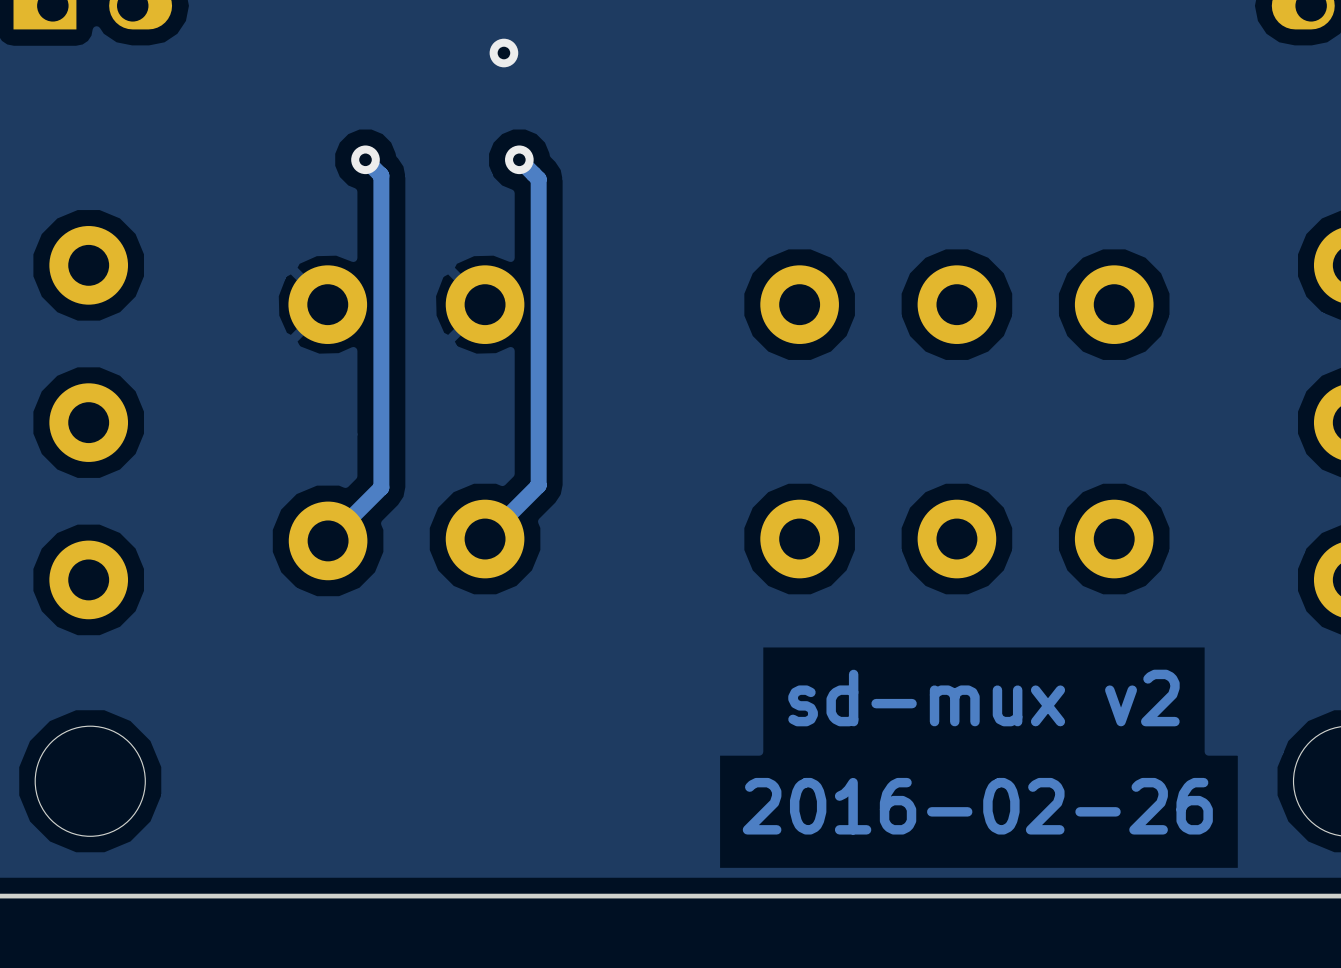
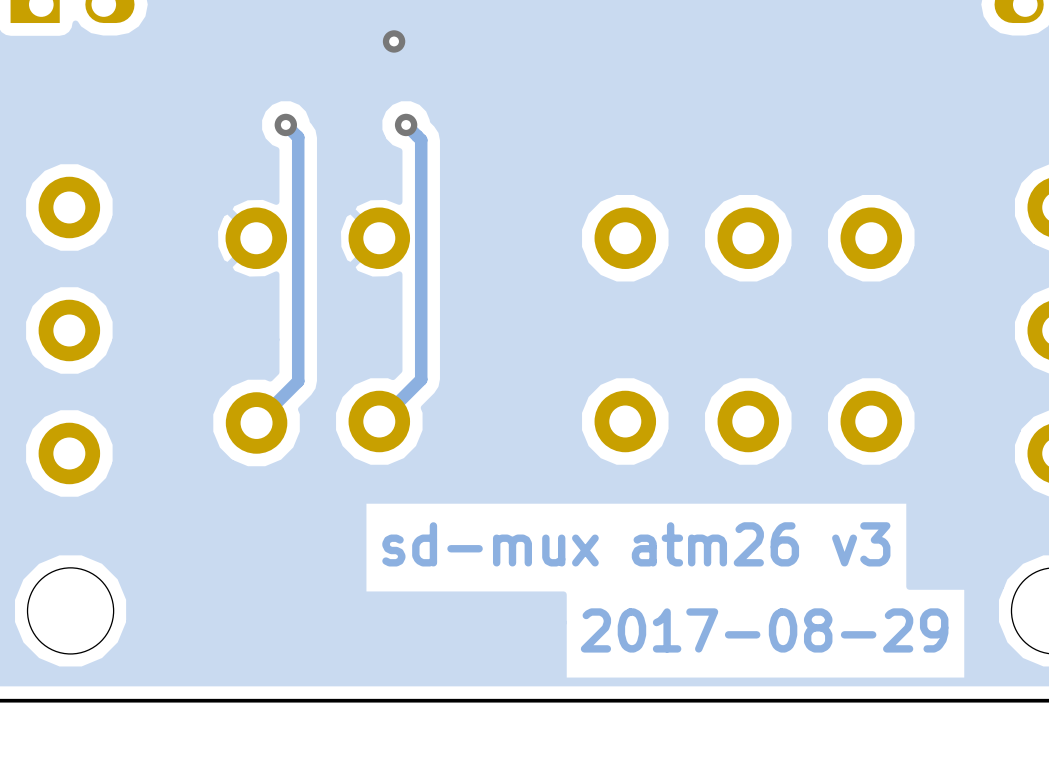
text: sd-mux v2 (983, 698) -> sd-mux atm26 v3 (636, 544)
text: 2016-02-26 (977, 806) -> 2017-08-29 (764, 630)

